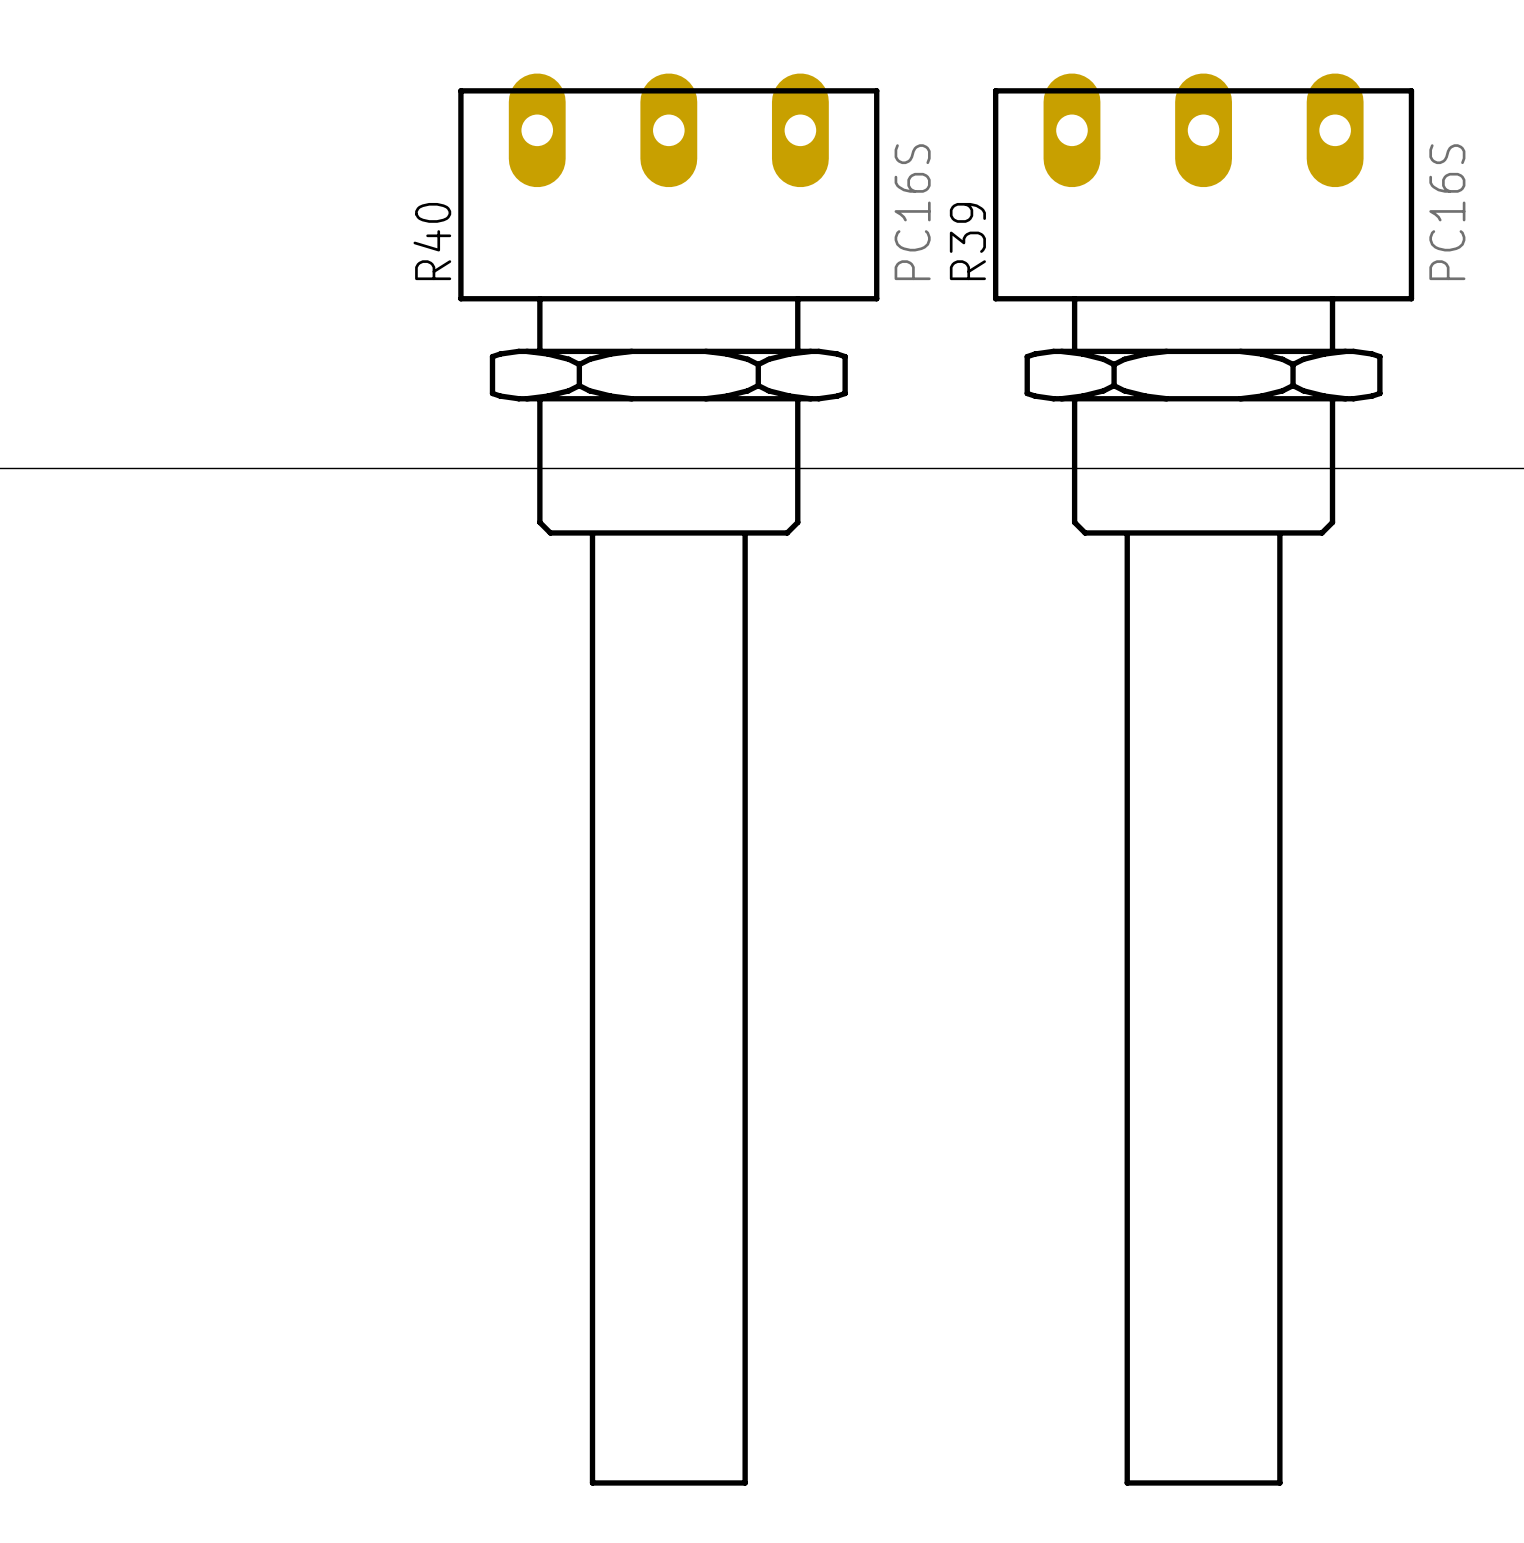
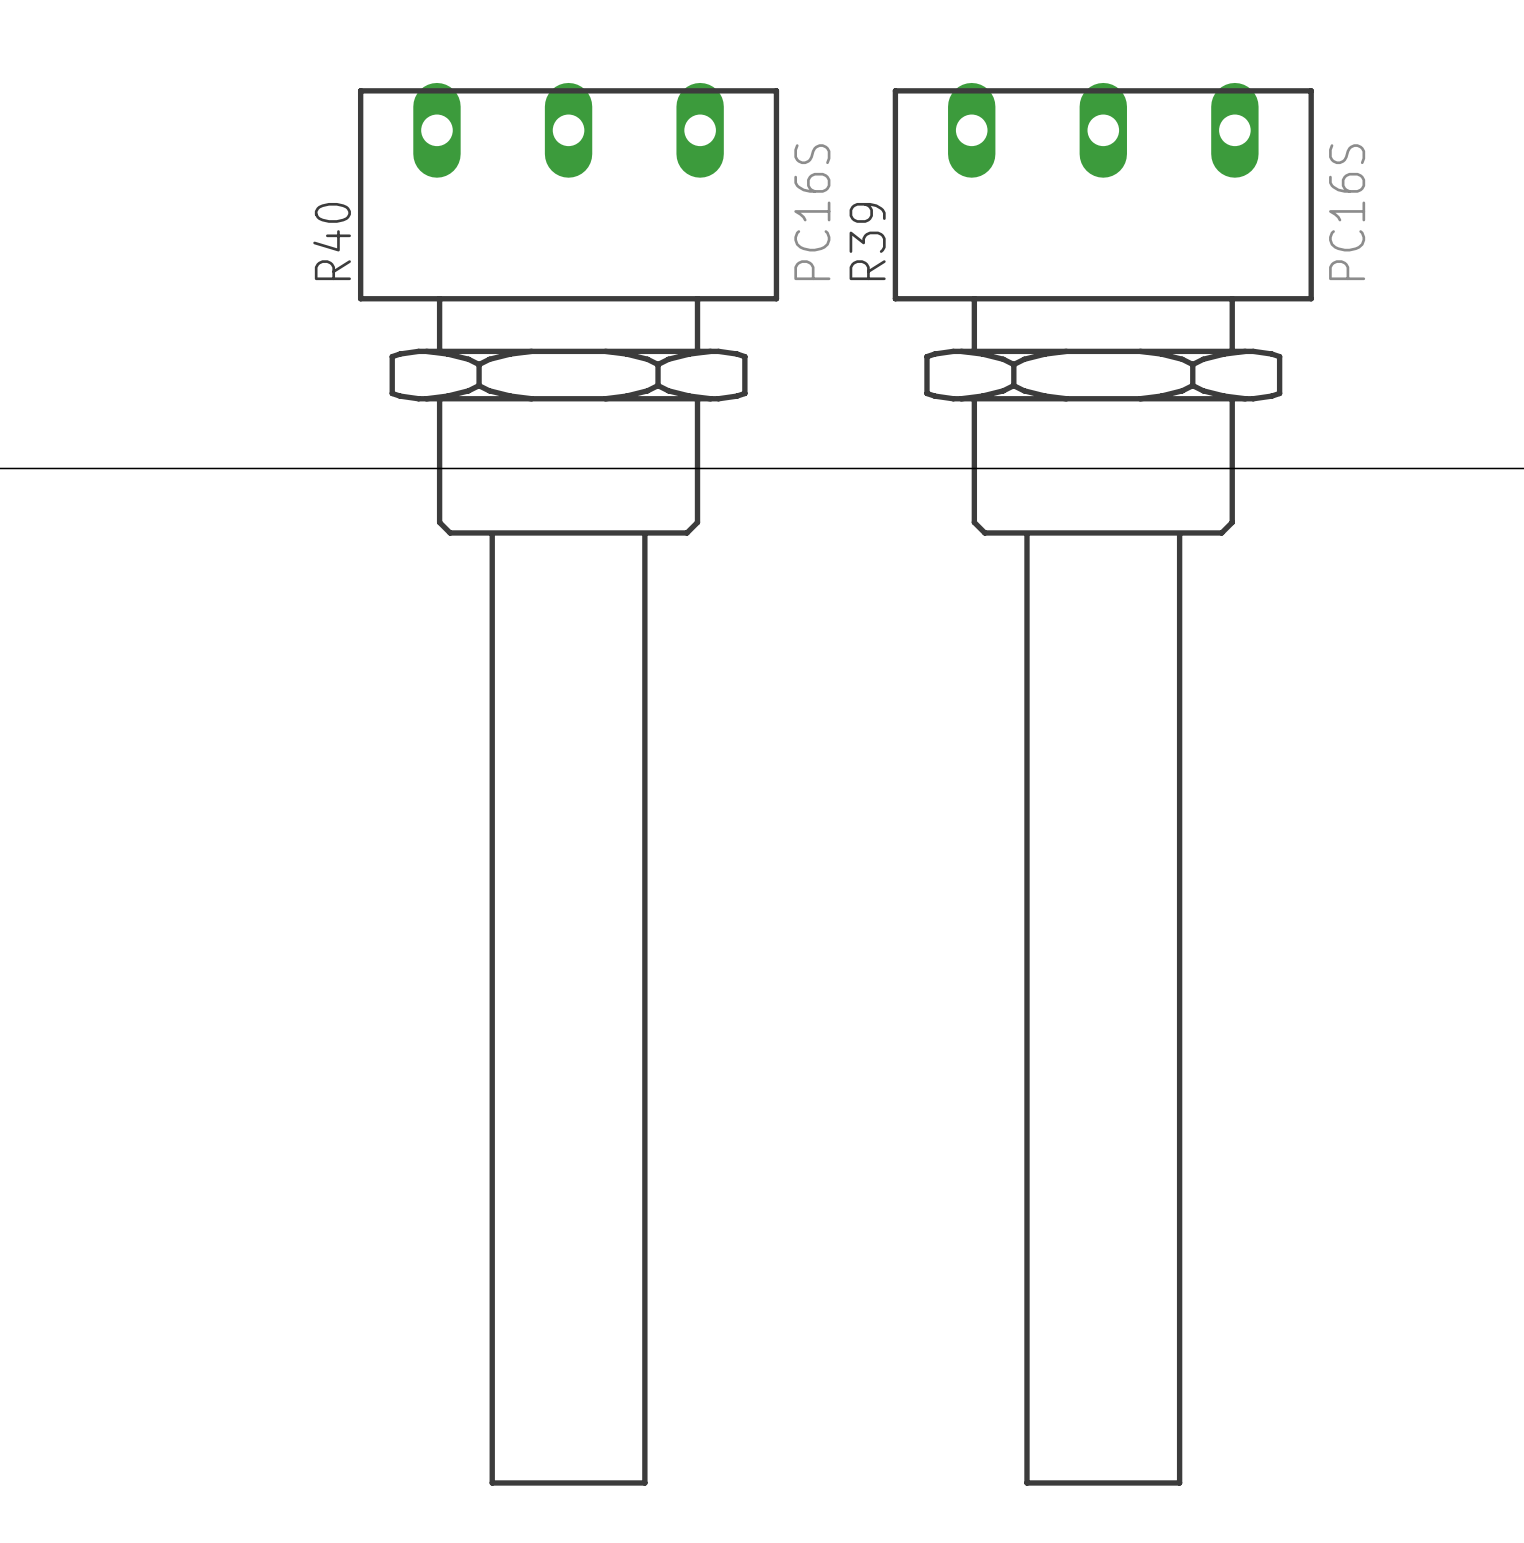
R40 footprint: [458, 73, 880, 1486] -> [357, 82, 780, 1486]
R39 footprint: [992, 73, 1415, 1486] -> [892, 82, 1314, 1486]

